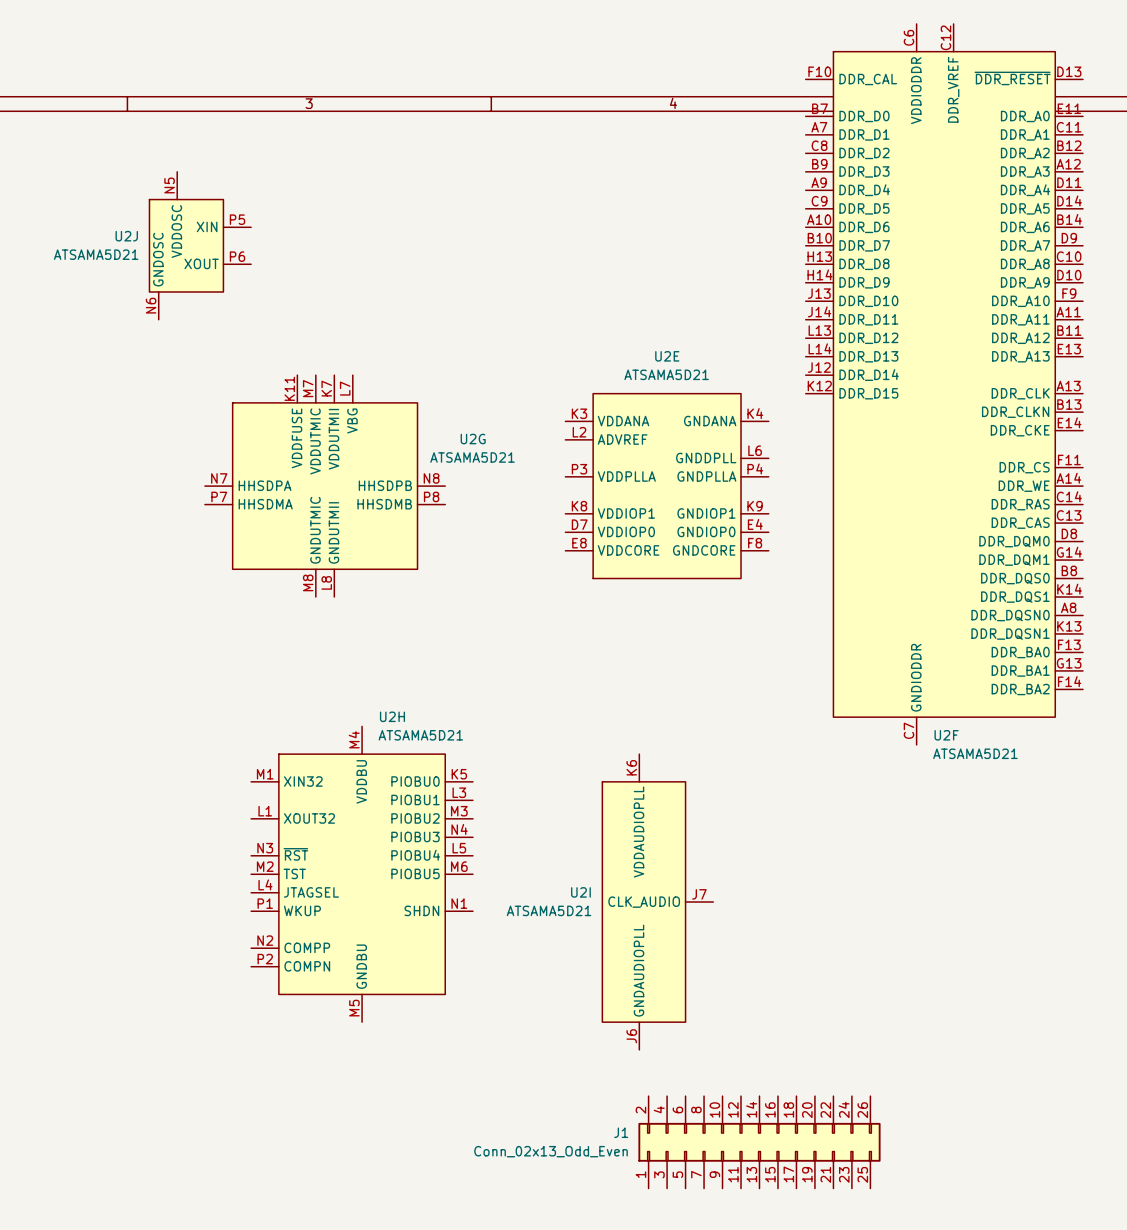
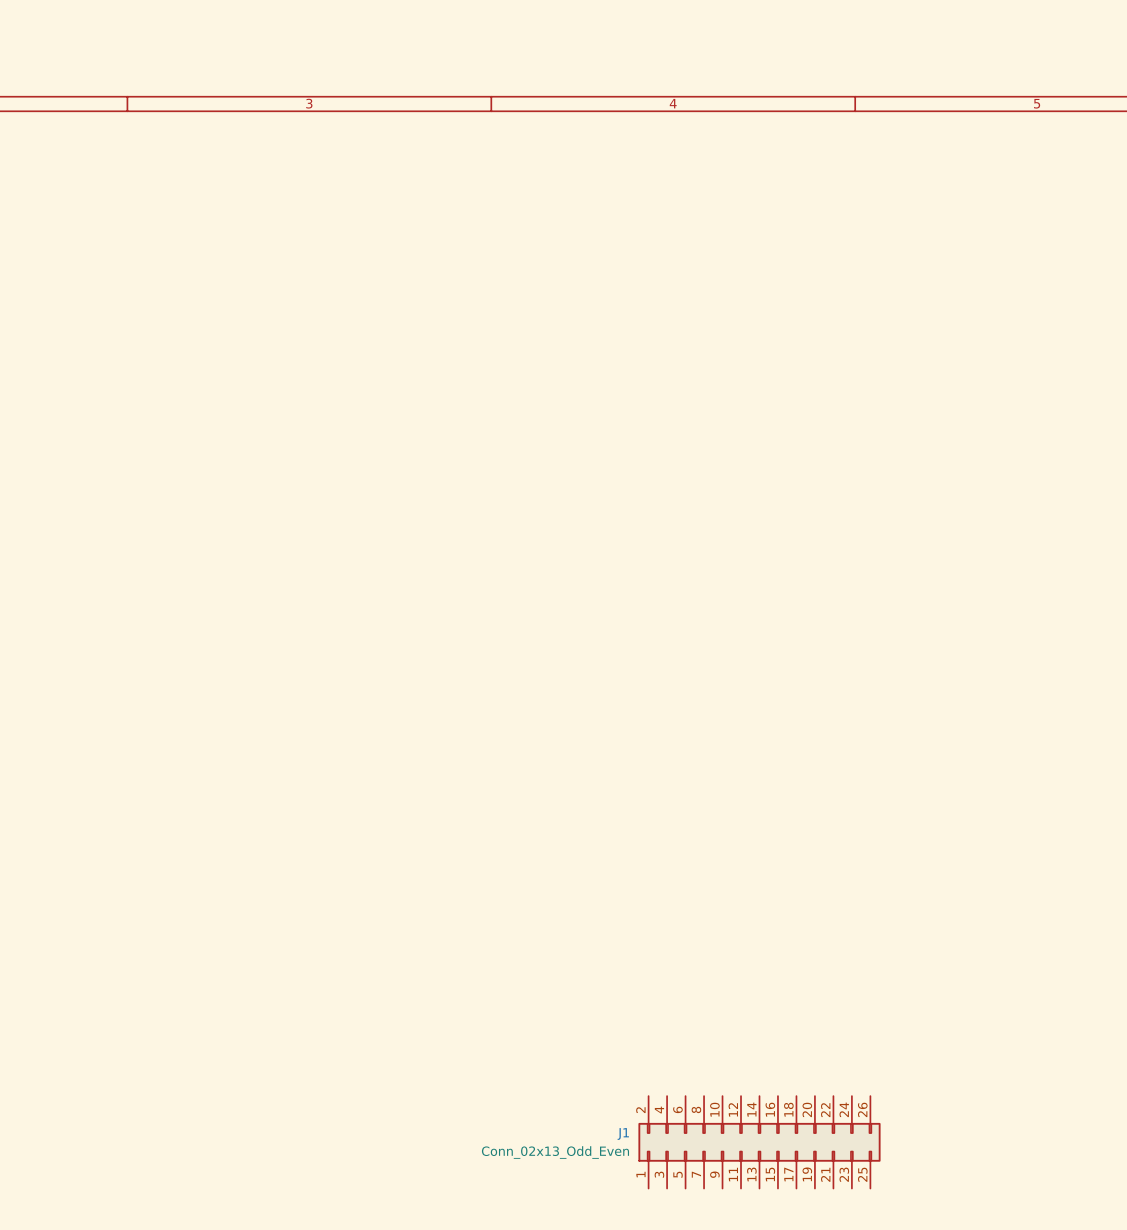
U2J: ATSAMA5D21 (200, 245) -> none
U2F: ATSAMA5D21 (944, 384) -> none
U2G: ATSAMA5D21 (325, 486) -> none
U2E: ATSAMA5D21 (667, 486) -> none
U2H: ATSAMA5D21 (362, 874) -> none
U2I: ATSAMA5D21 (657, 902) -> none

